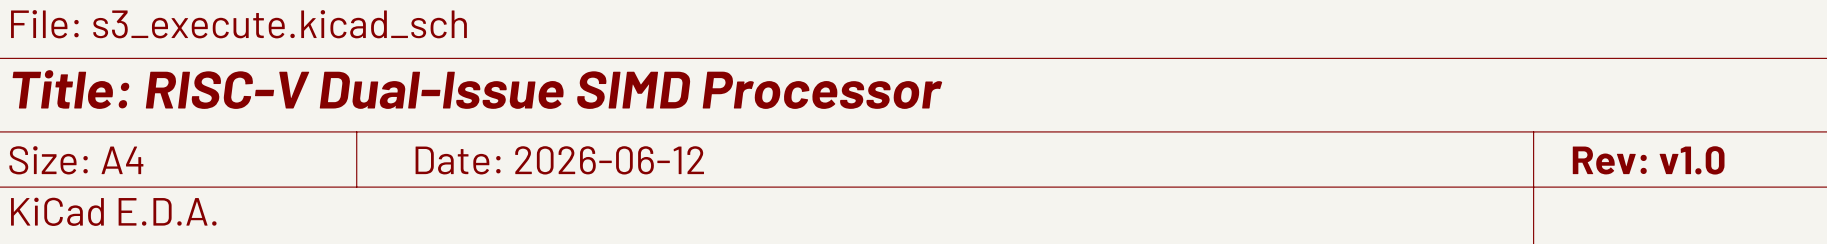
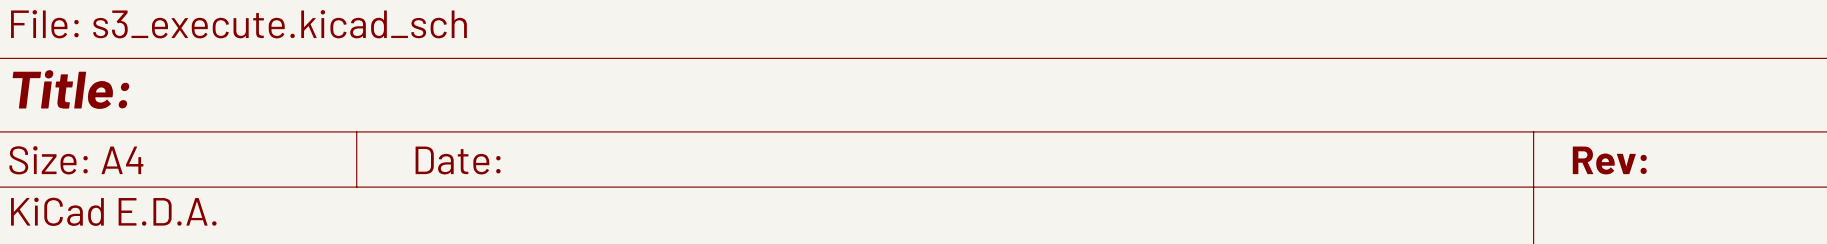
title block: Title: RISC-V Dual-Issue SIMD Processor (477, 89) -> Title: (71, 89)
title block: Date: 2026-06-12 (559, 160) -> Date: (458, 160)
title block: Rev: v1.0 (1648, 160) -> Rev: (1609, 160)

